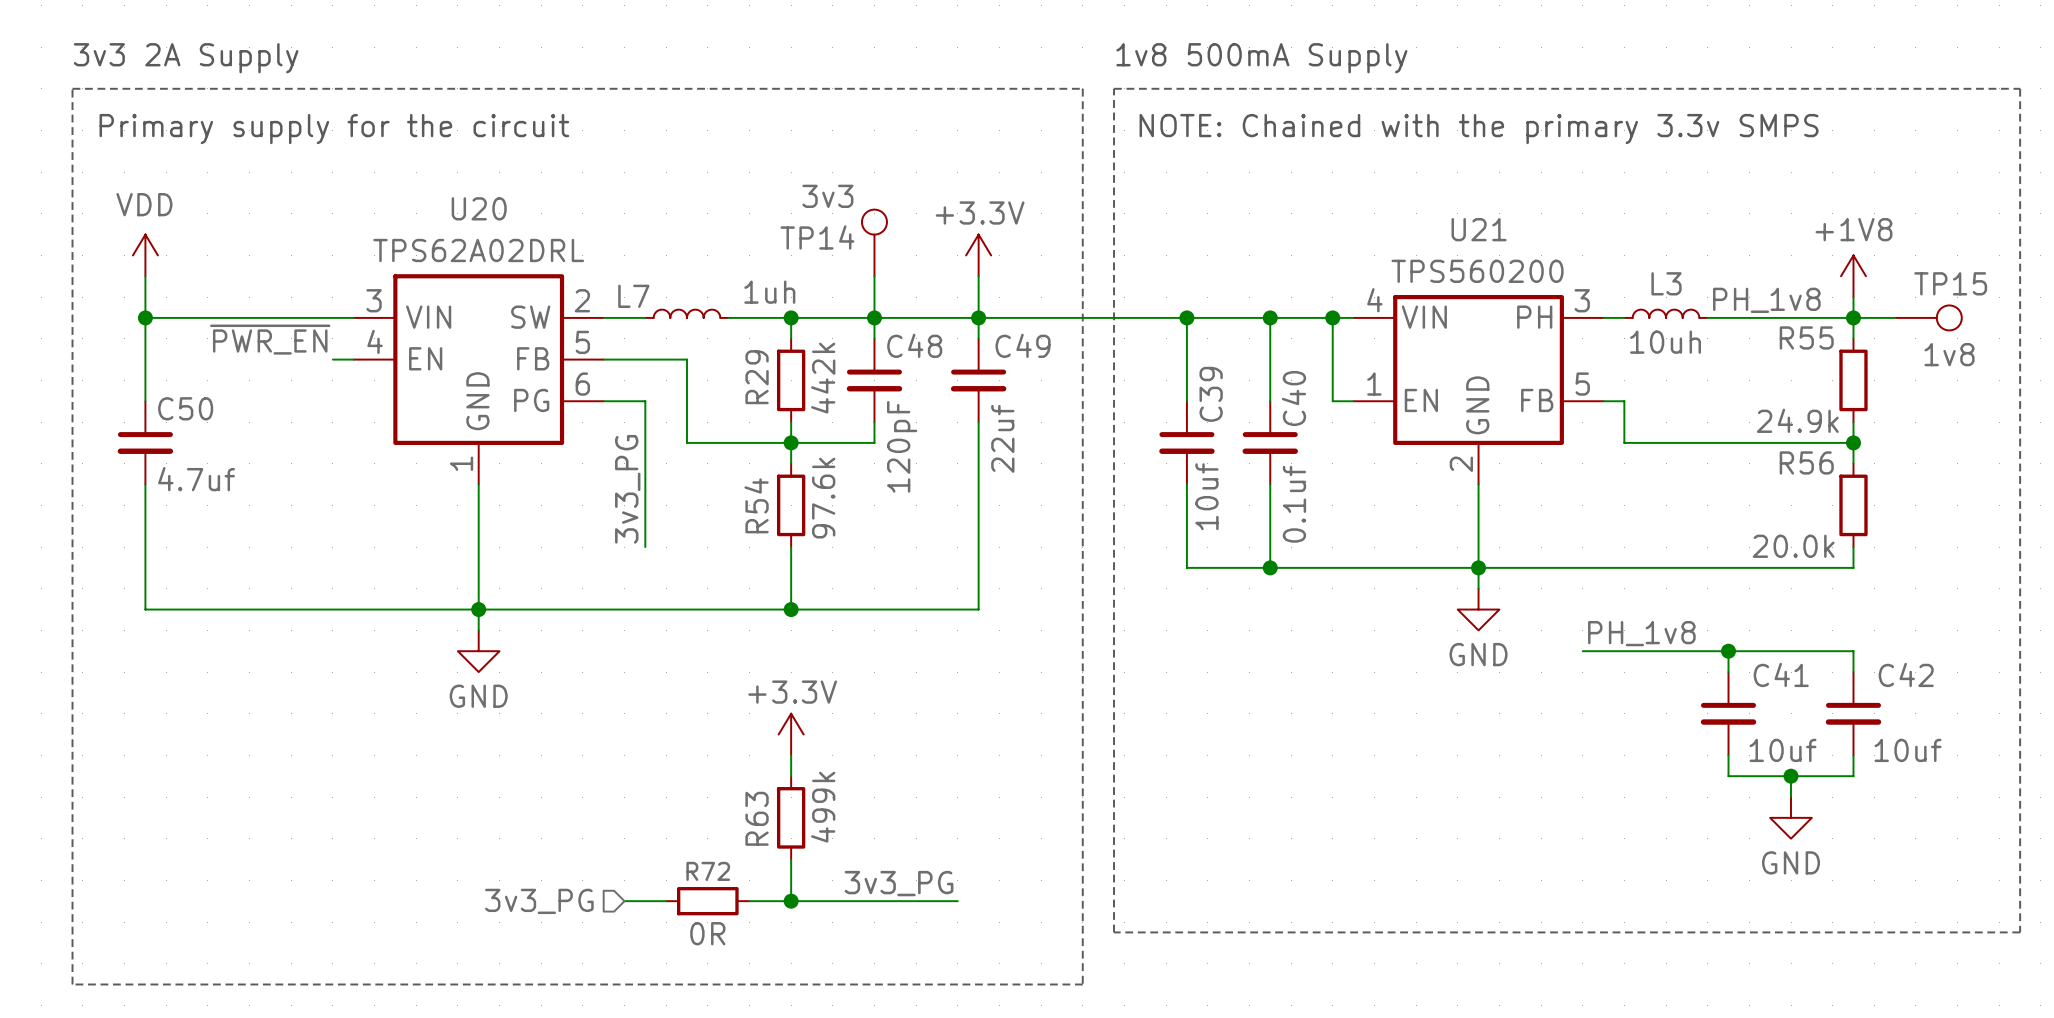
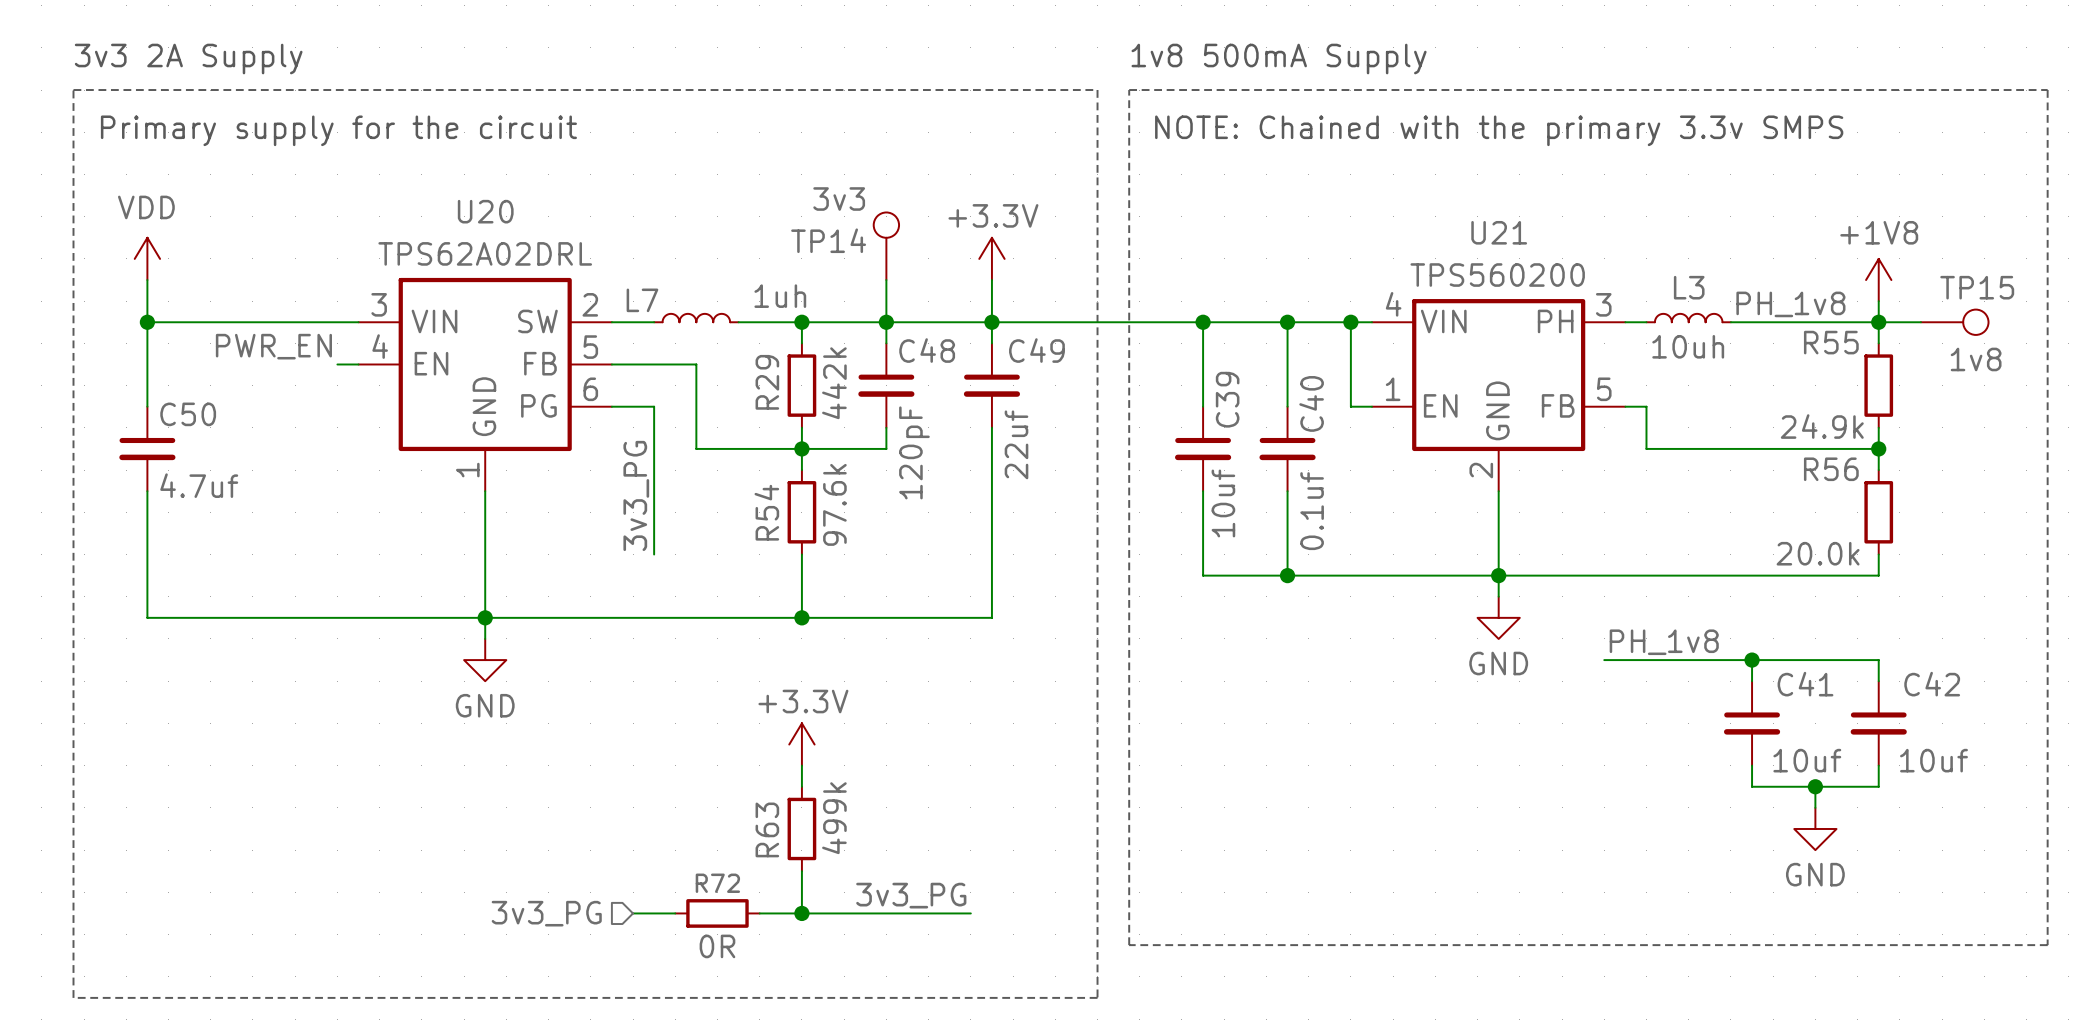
label: ~{PWR_EN} (270, 339) -> PWR_EN (273, 346)

